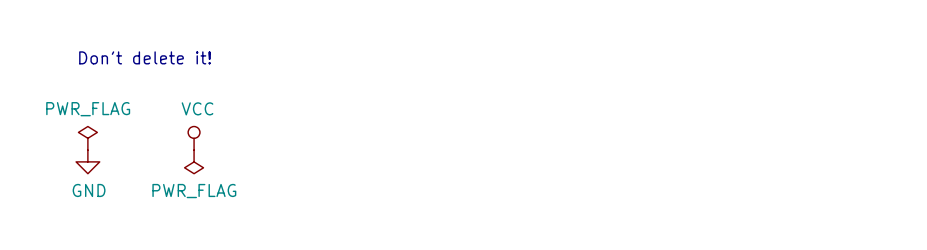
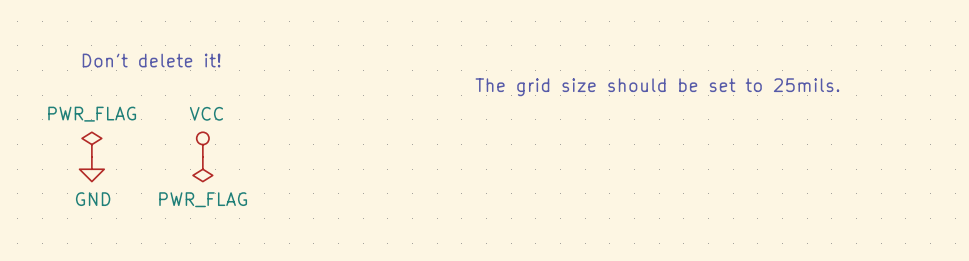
text: none -> The grid size should be set to 25mils. (657, 87)

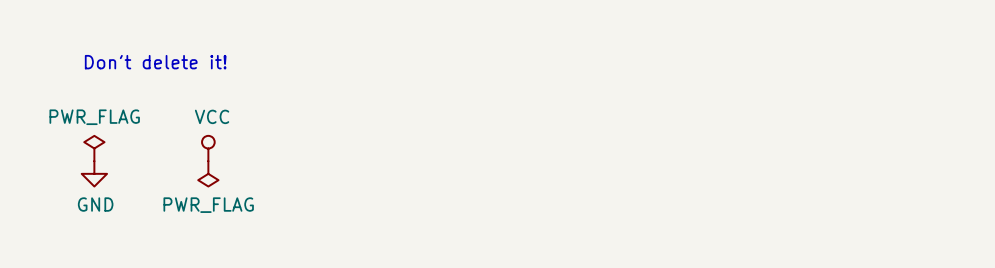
text: The grid size should be set to 25mils. (657, 87) -> none

